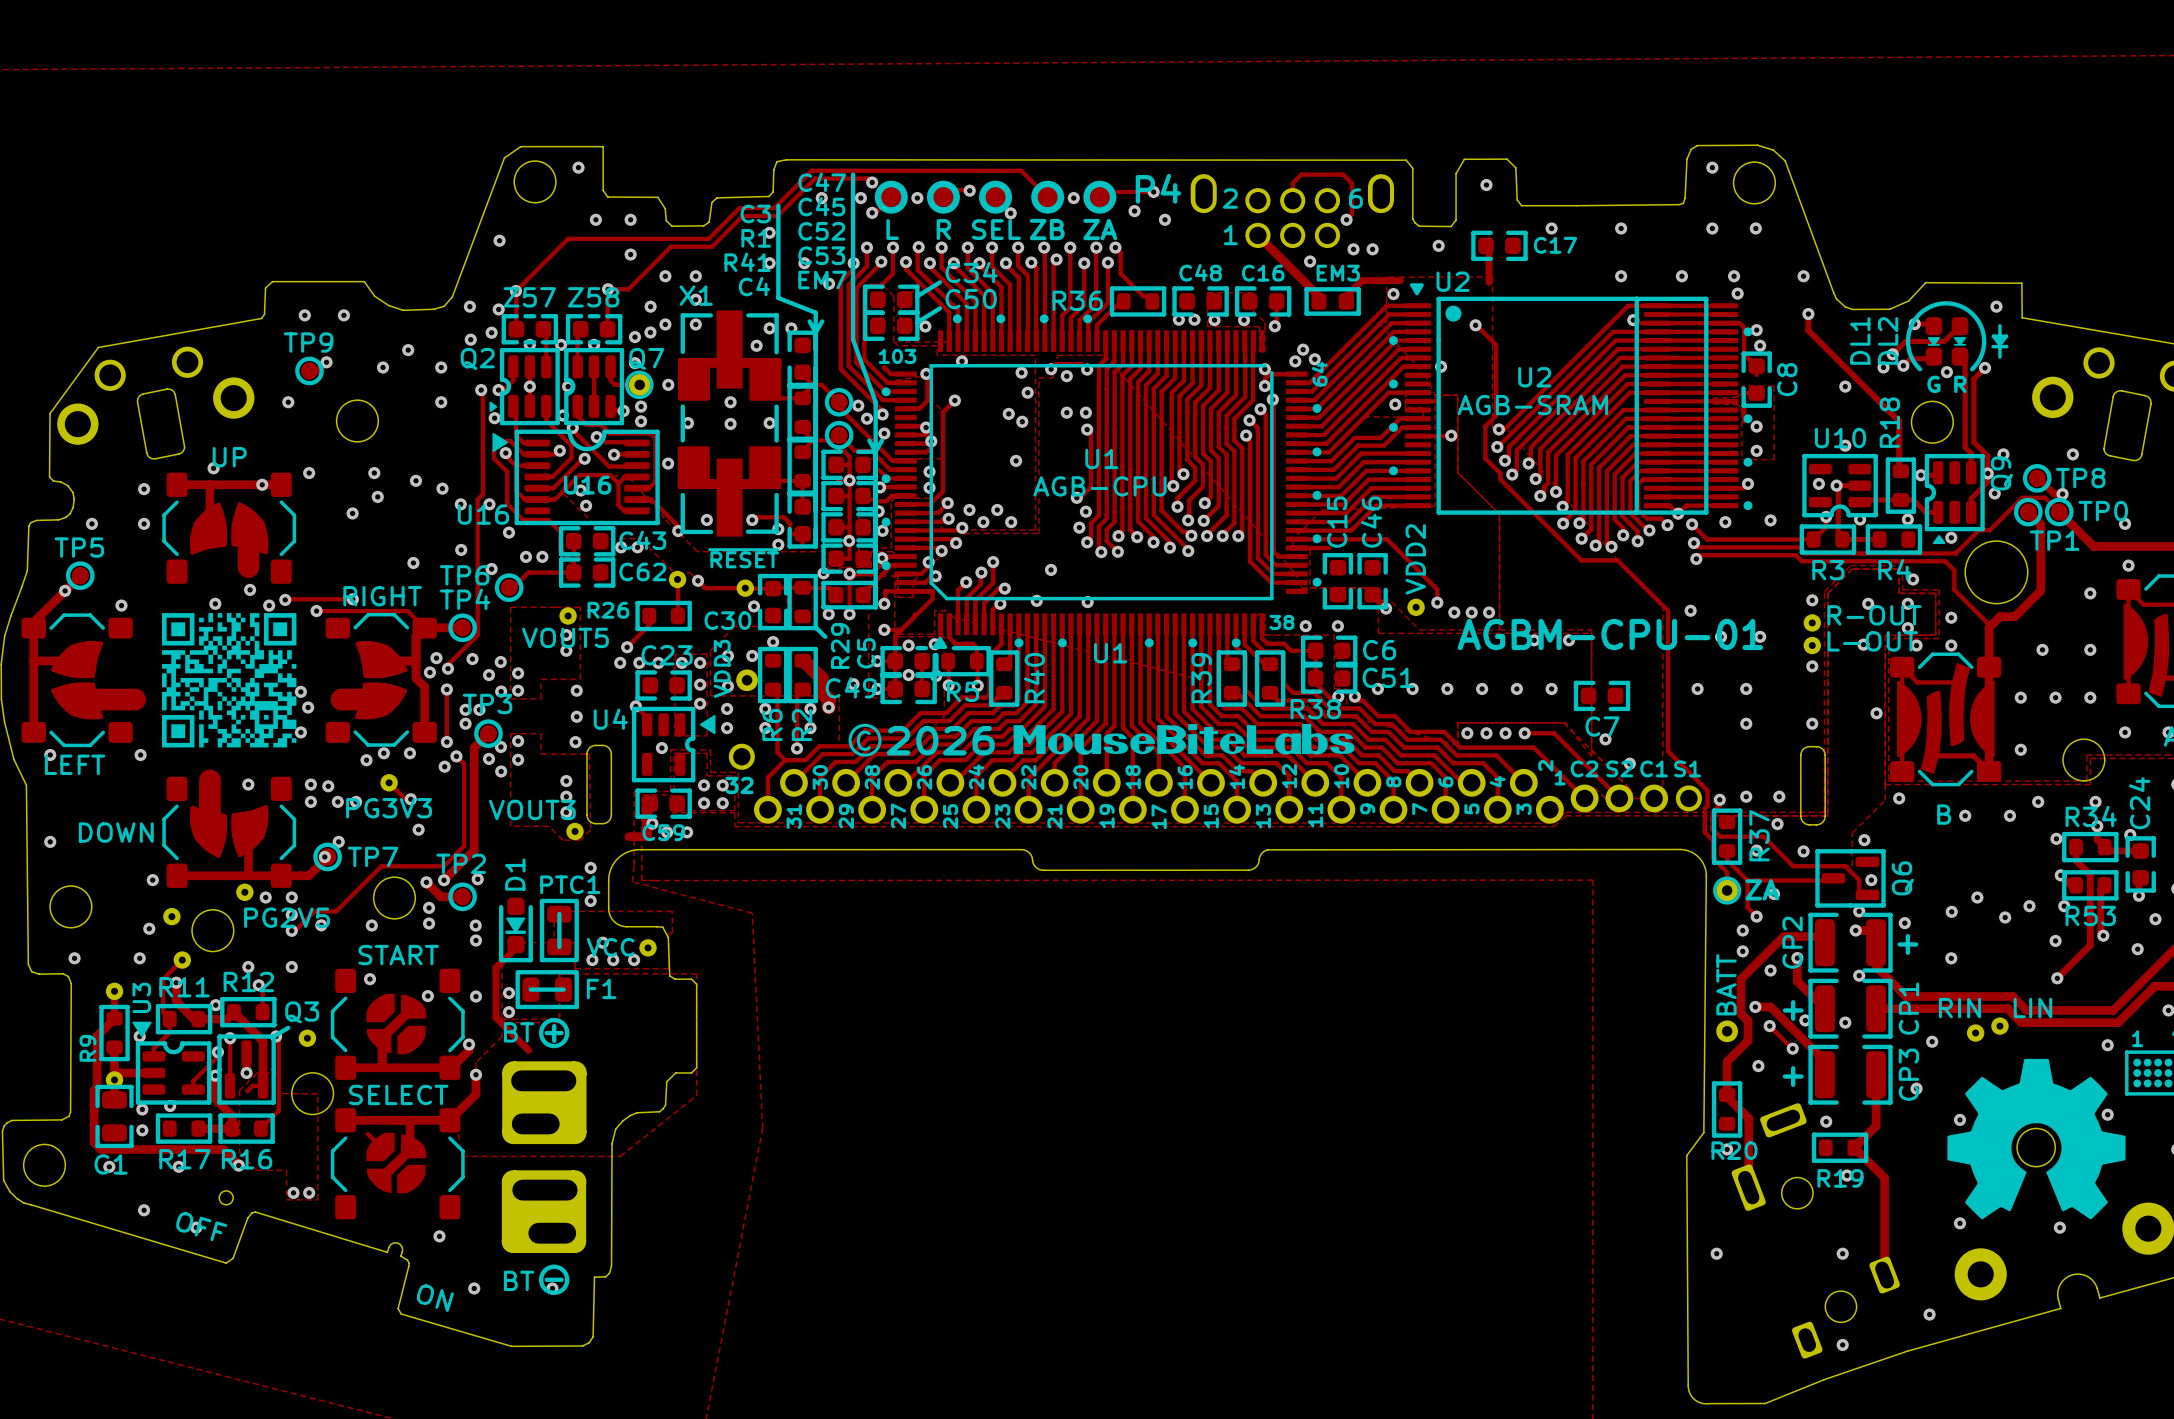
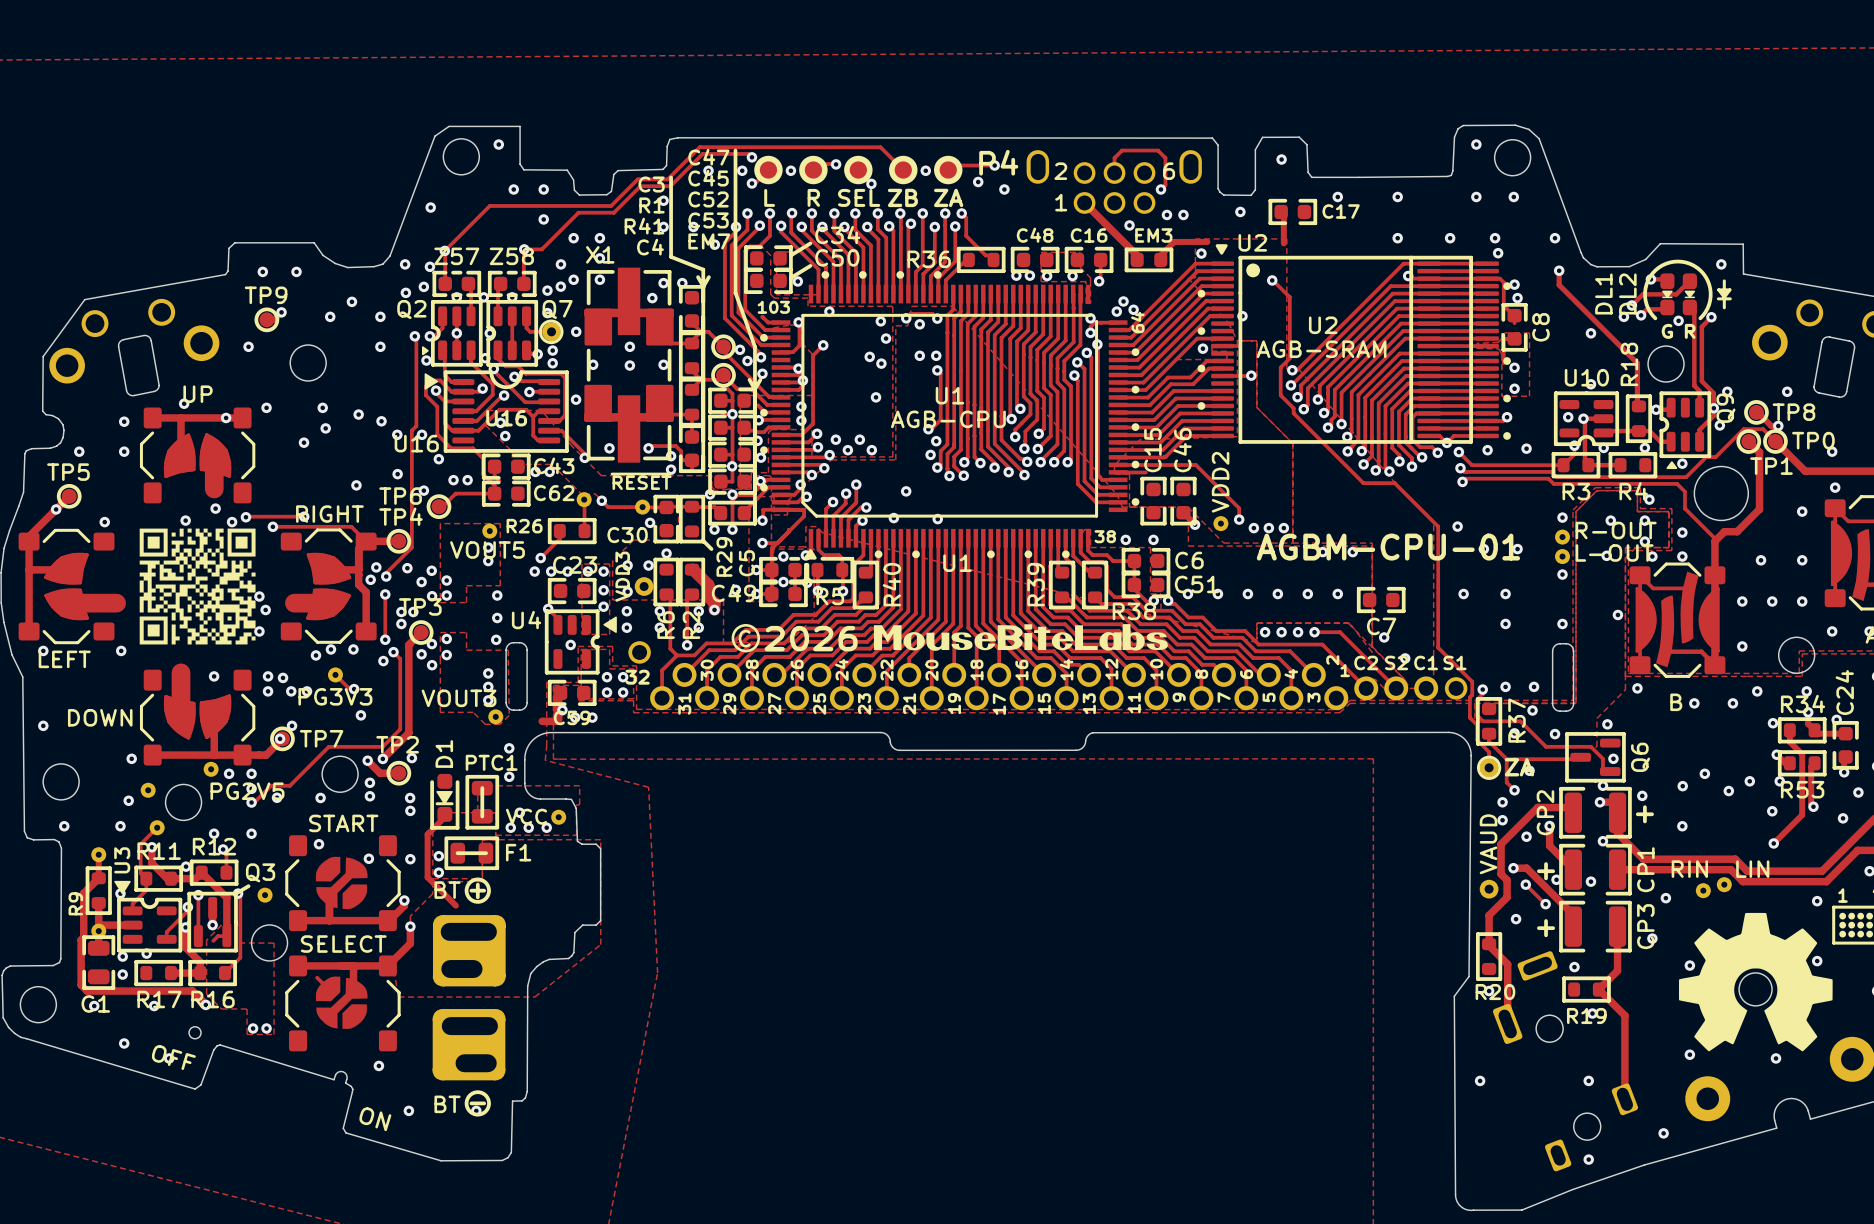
part value: BATT (1726, 984) -> VAUD (1488, 844)

